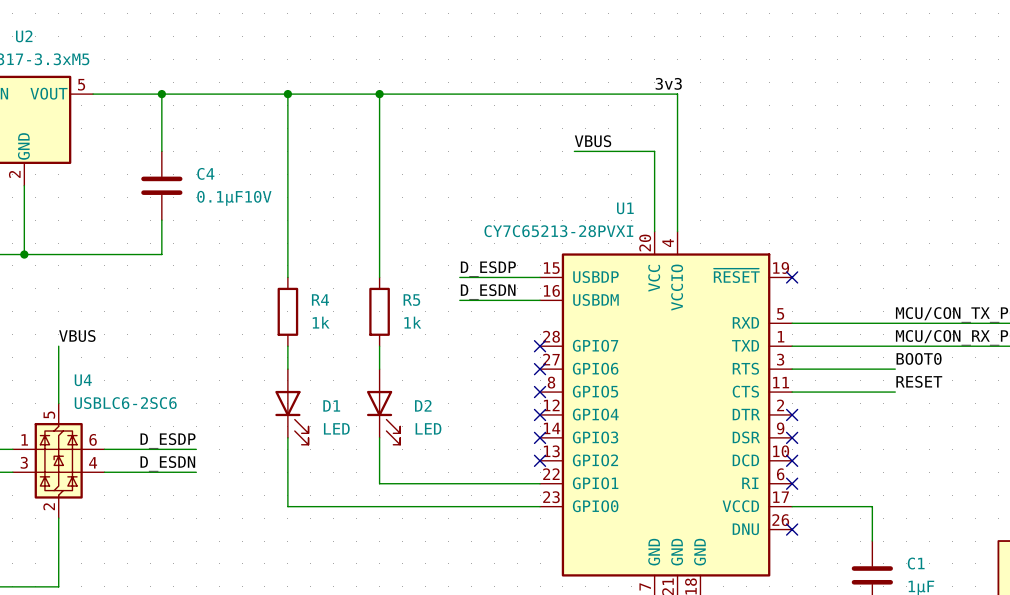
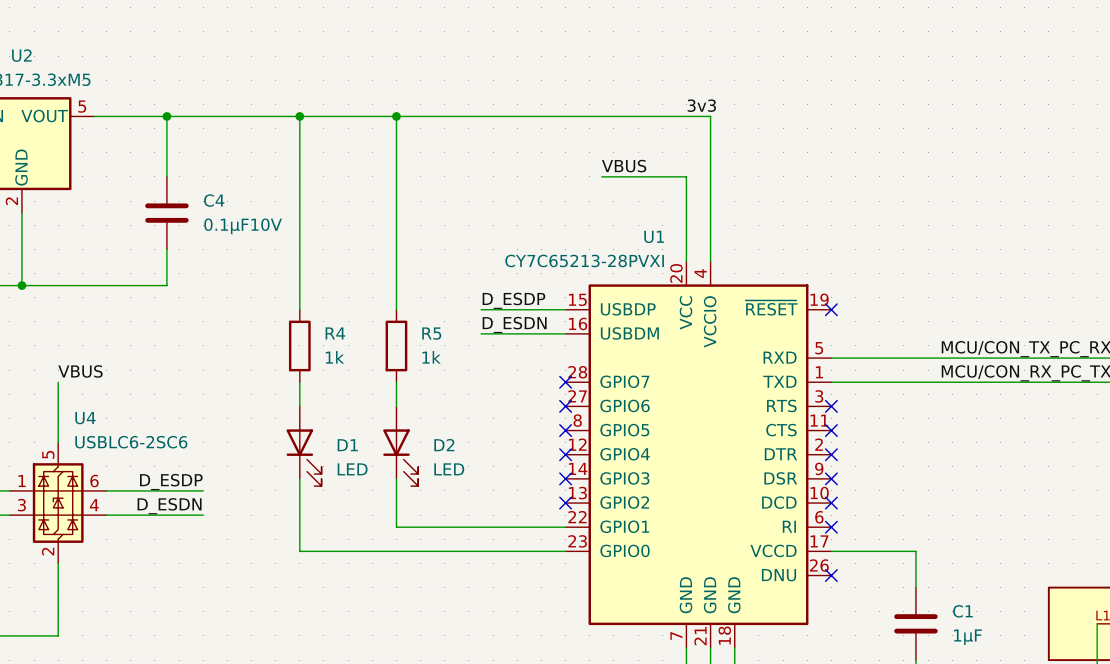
label: BOOT0 (919, 358) -> none
wire: (792, 369) (895, 369) -> none
no-connect mark: none -> (831, 406)
label: RESET (919, 381) -> none
wire: (792, 392) (895, 392) -> none
no-connect mark: none -> (831, 430)

